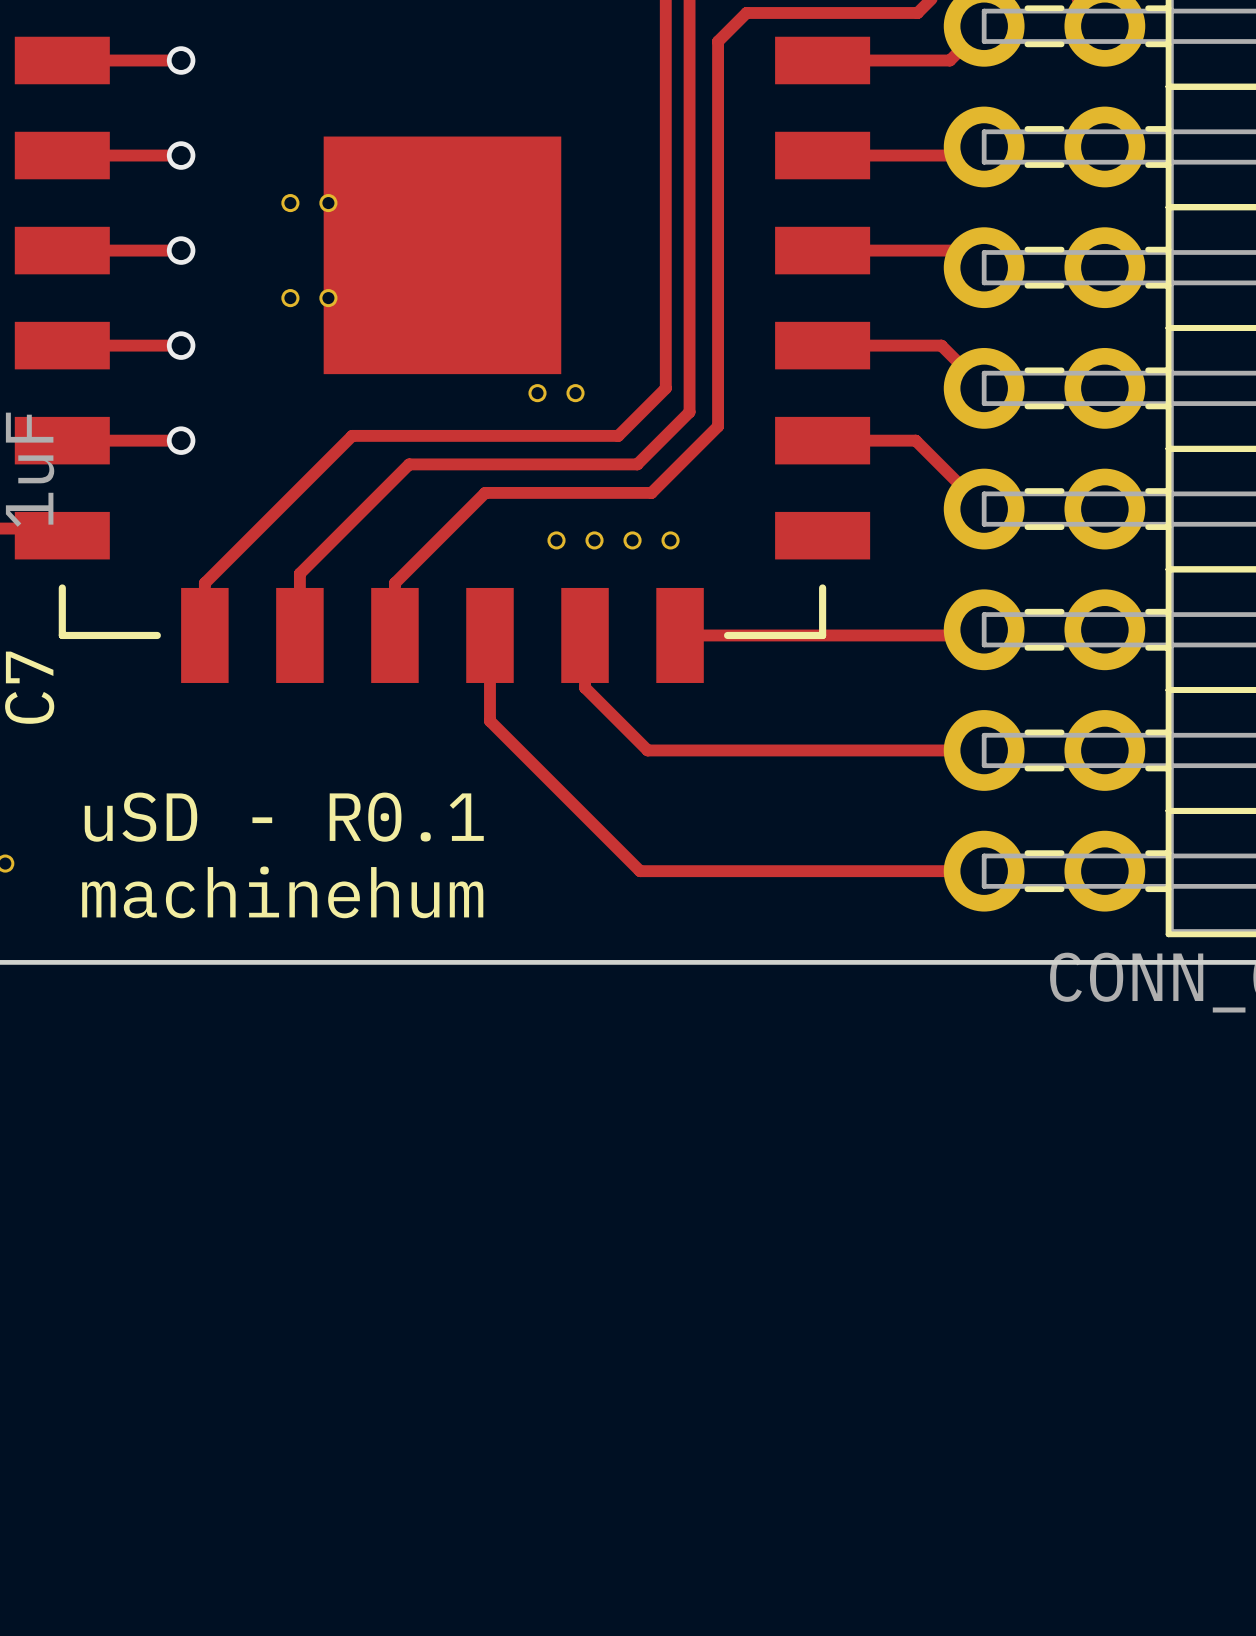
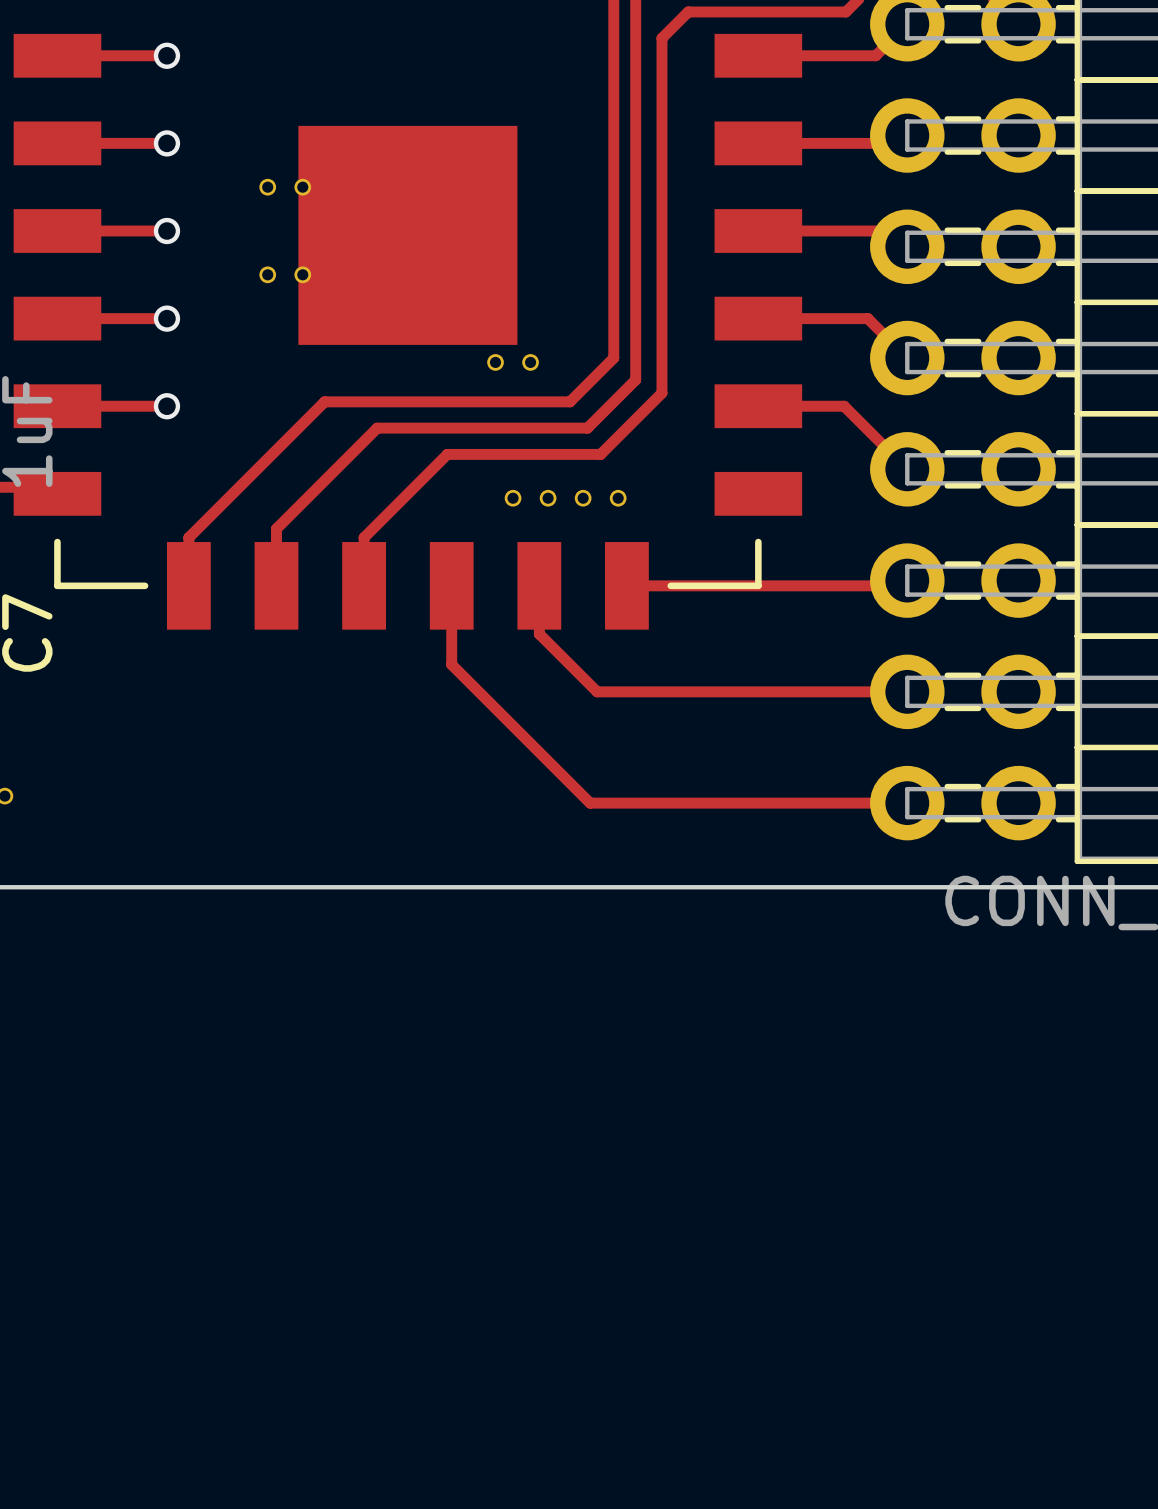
text: uSD - R0.1 (284, 817) -> none
text: machinehum (282, 892) -> none

